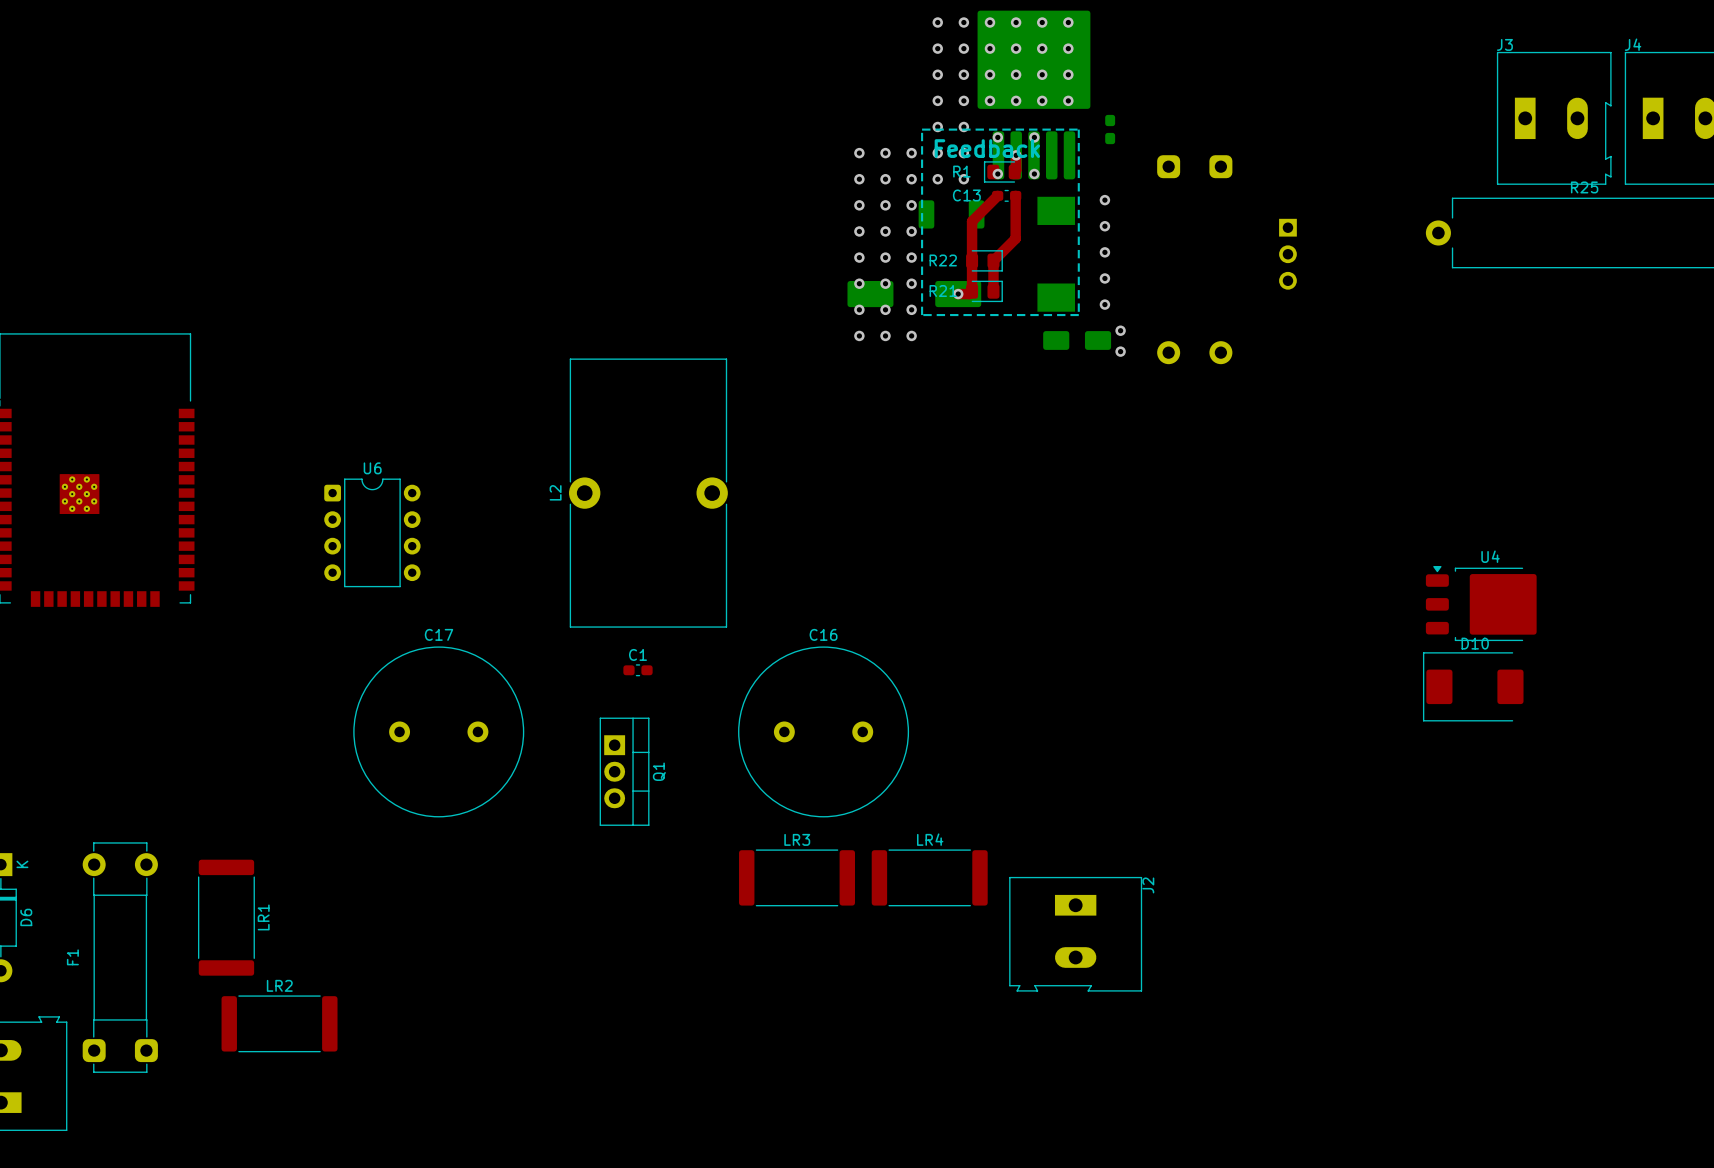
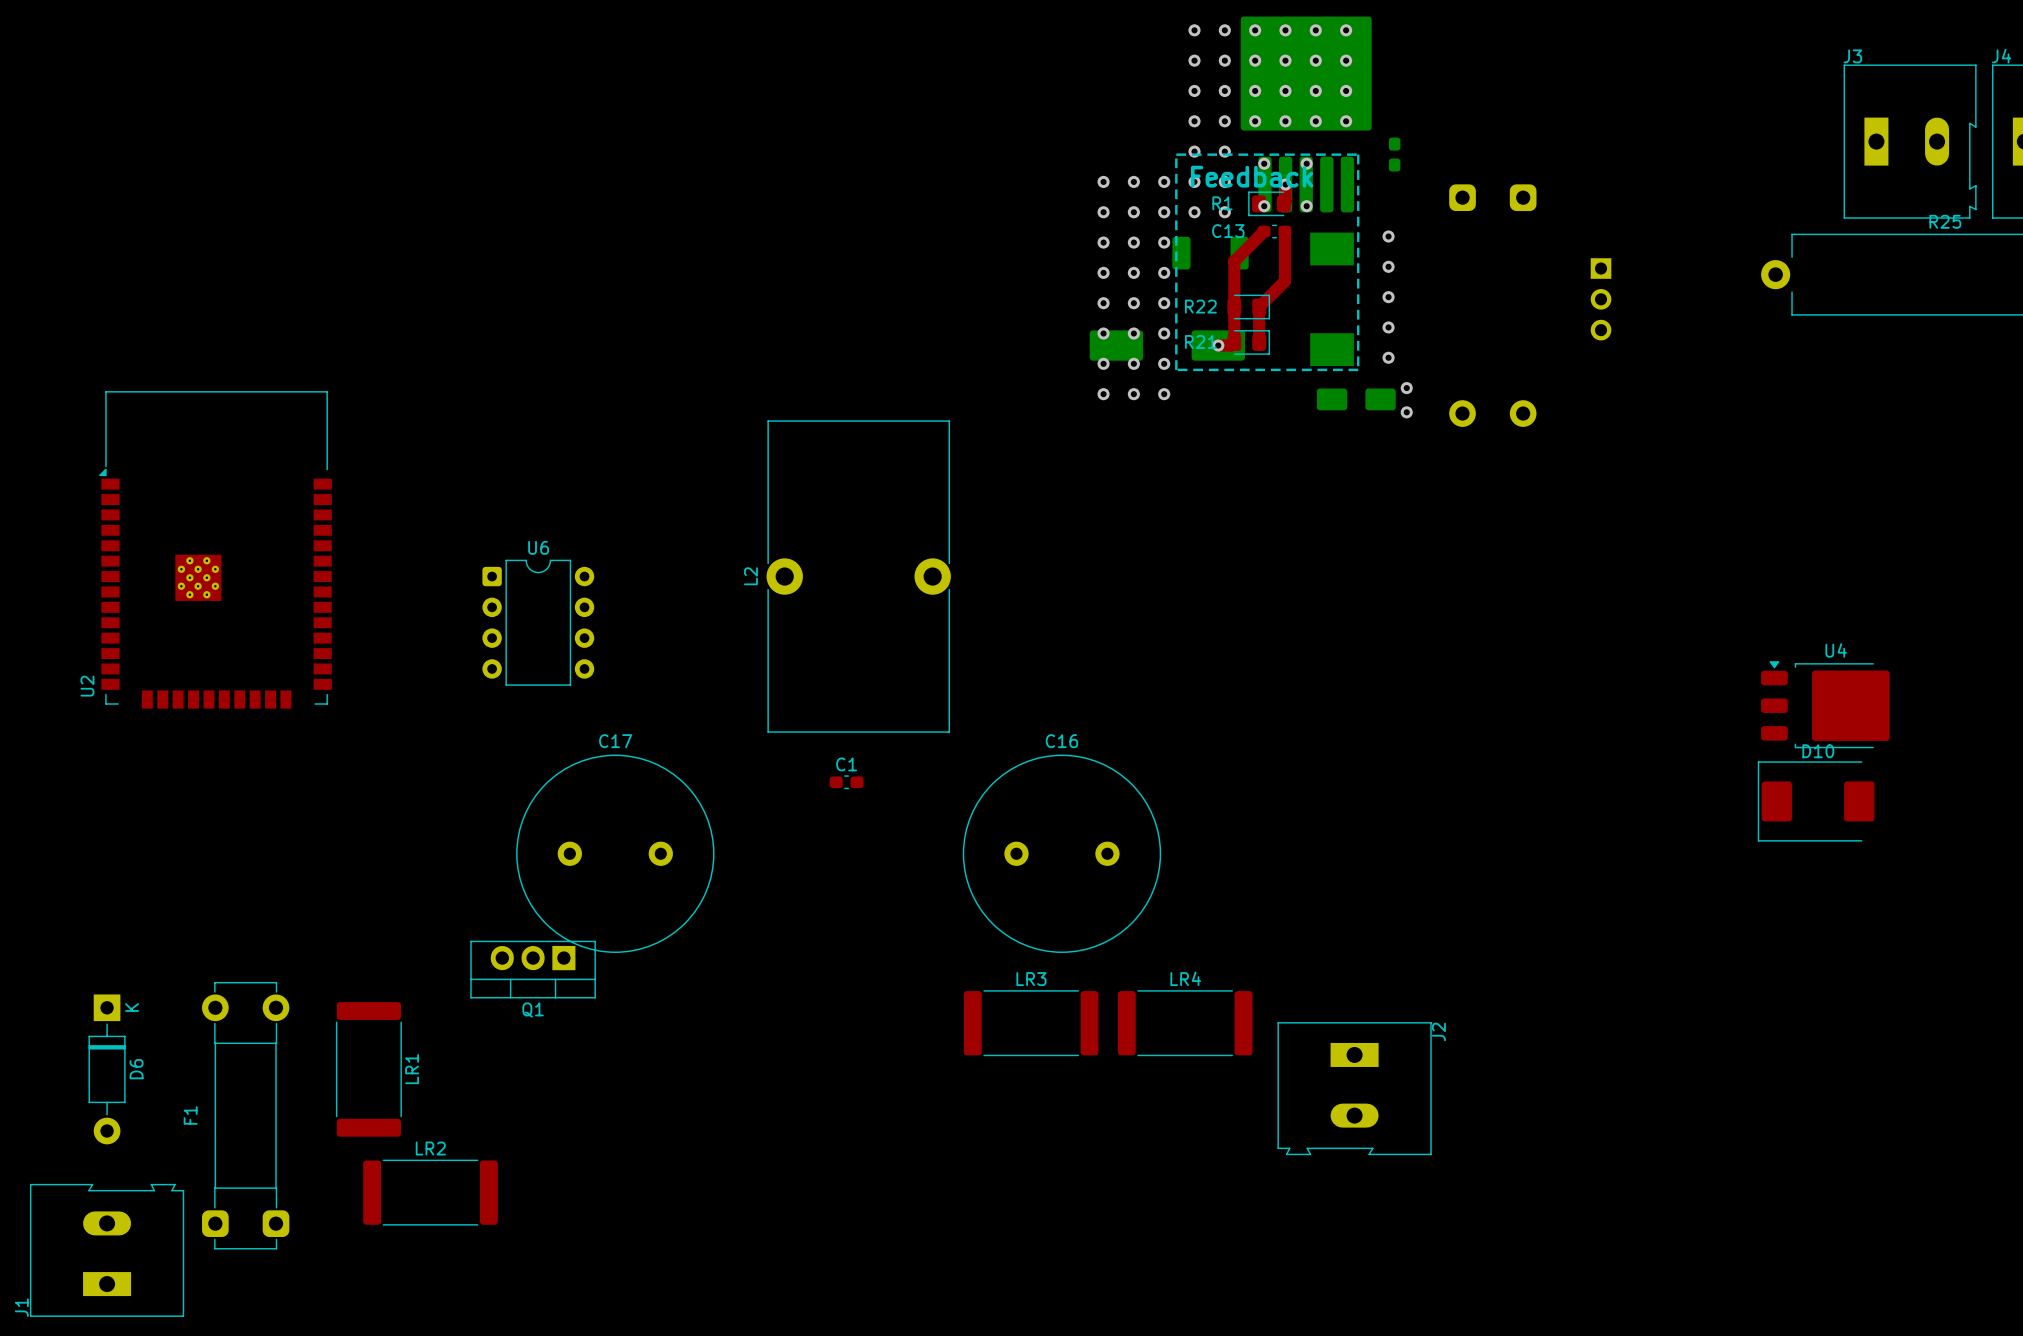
Q1 rotation: 0° (624, 771) -> 90° clockwise (533, 969)
Q1 position: (624, 771) -> (533, 969)

